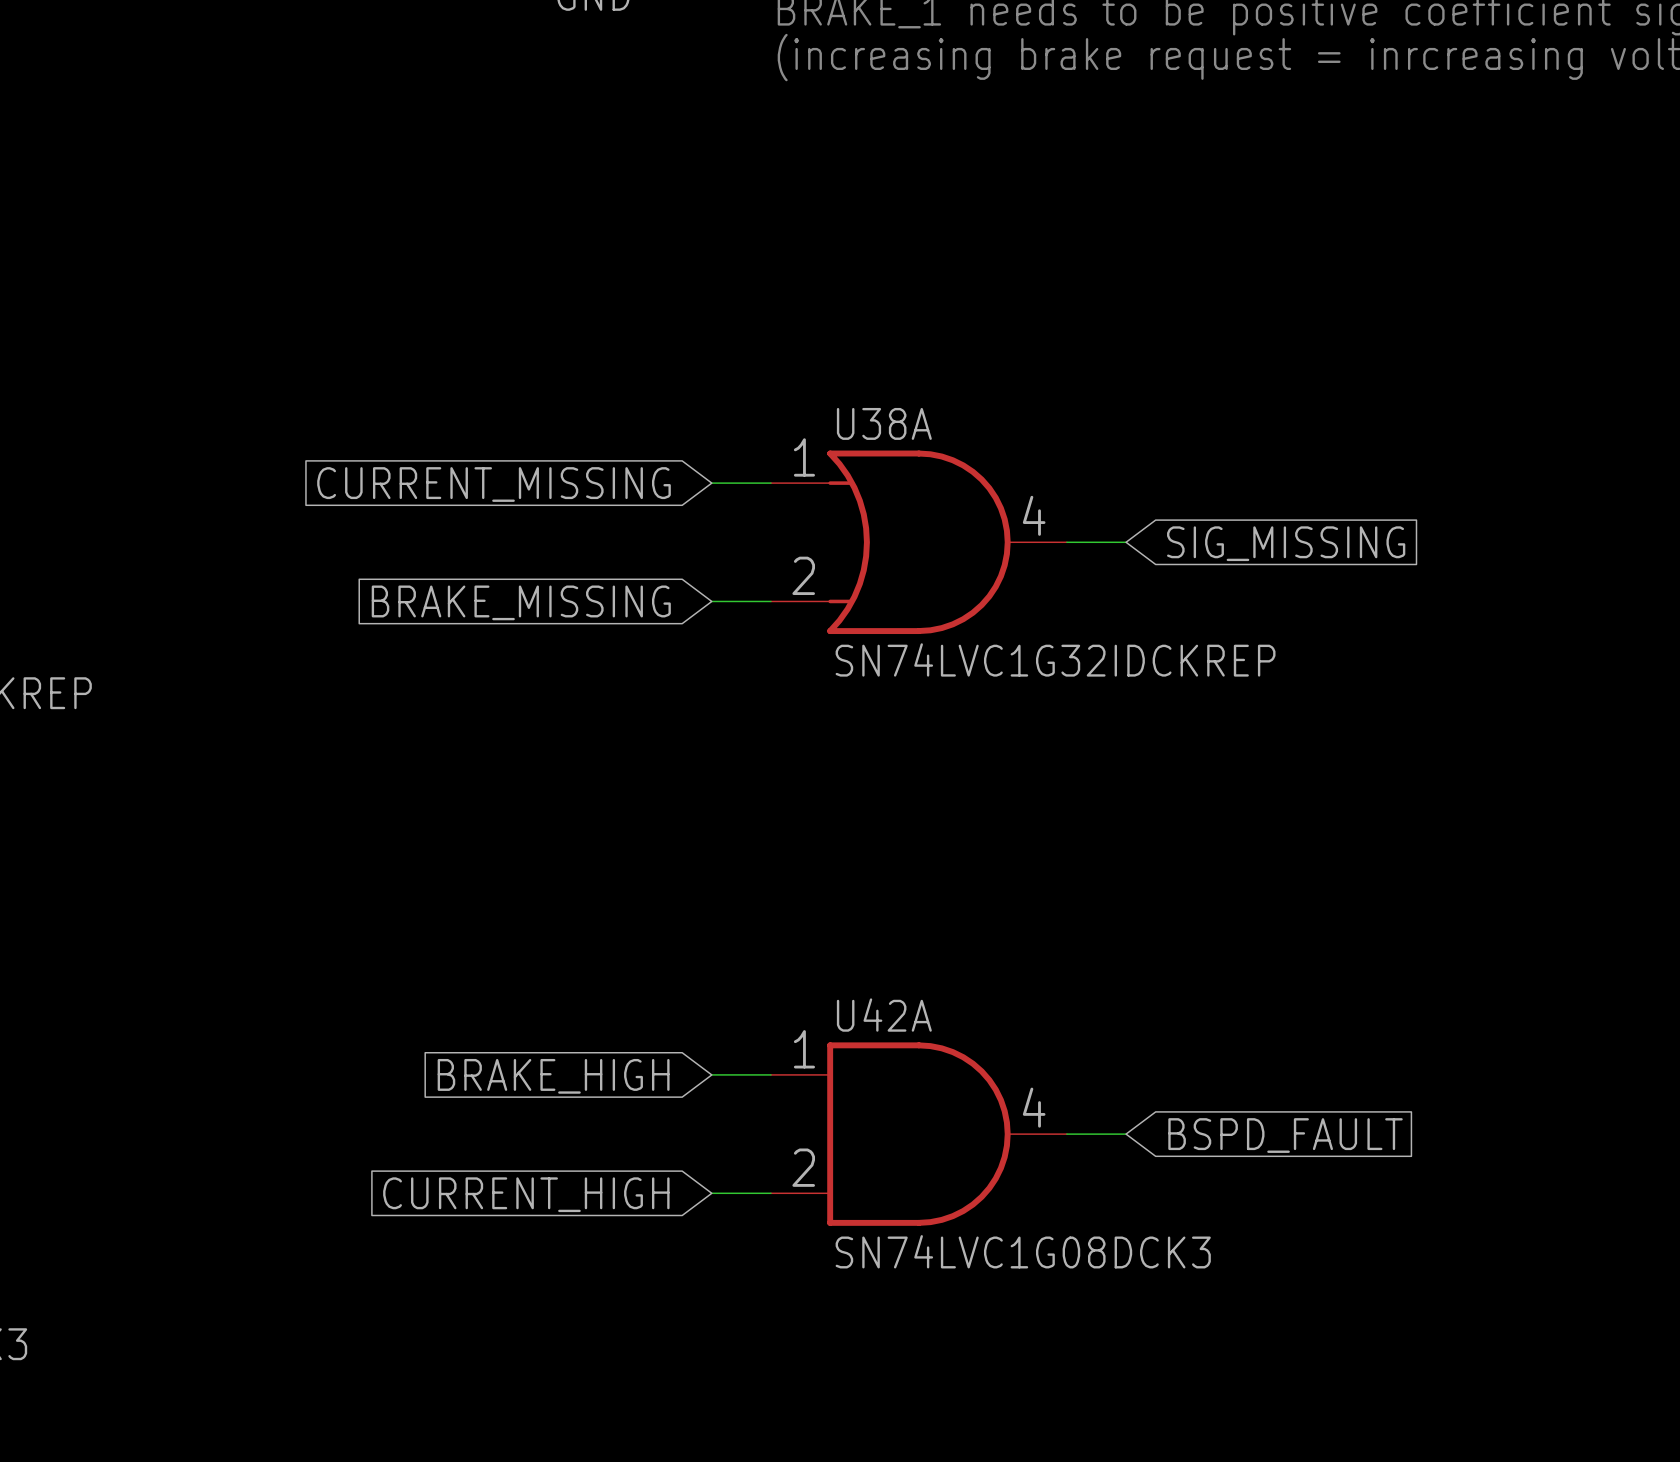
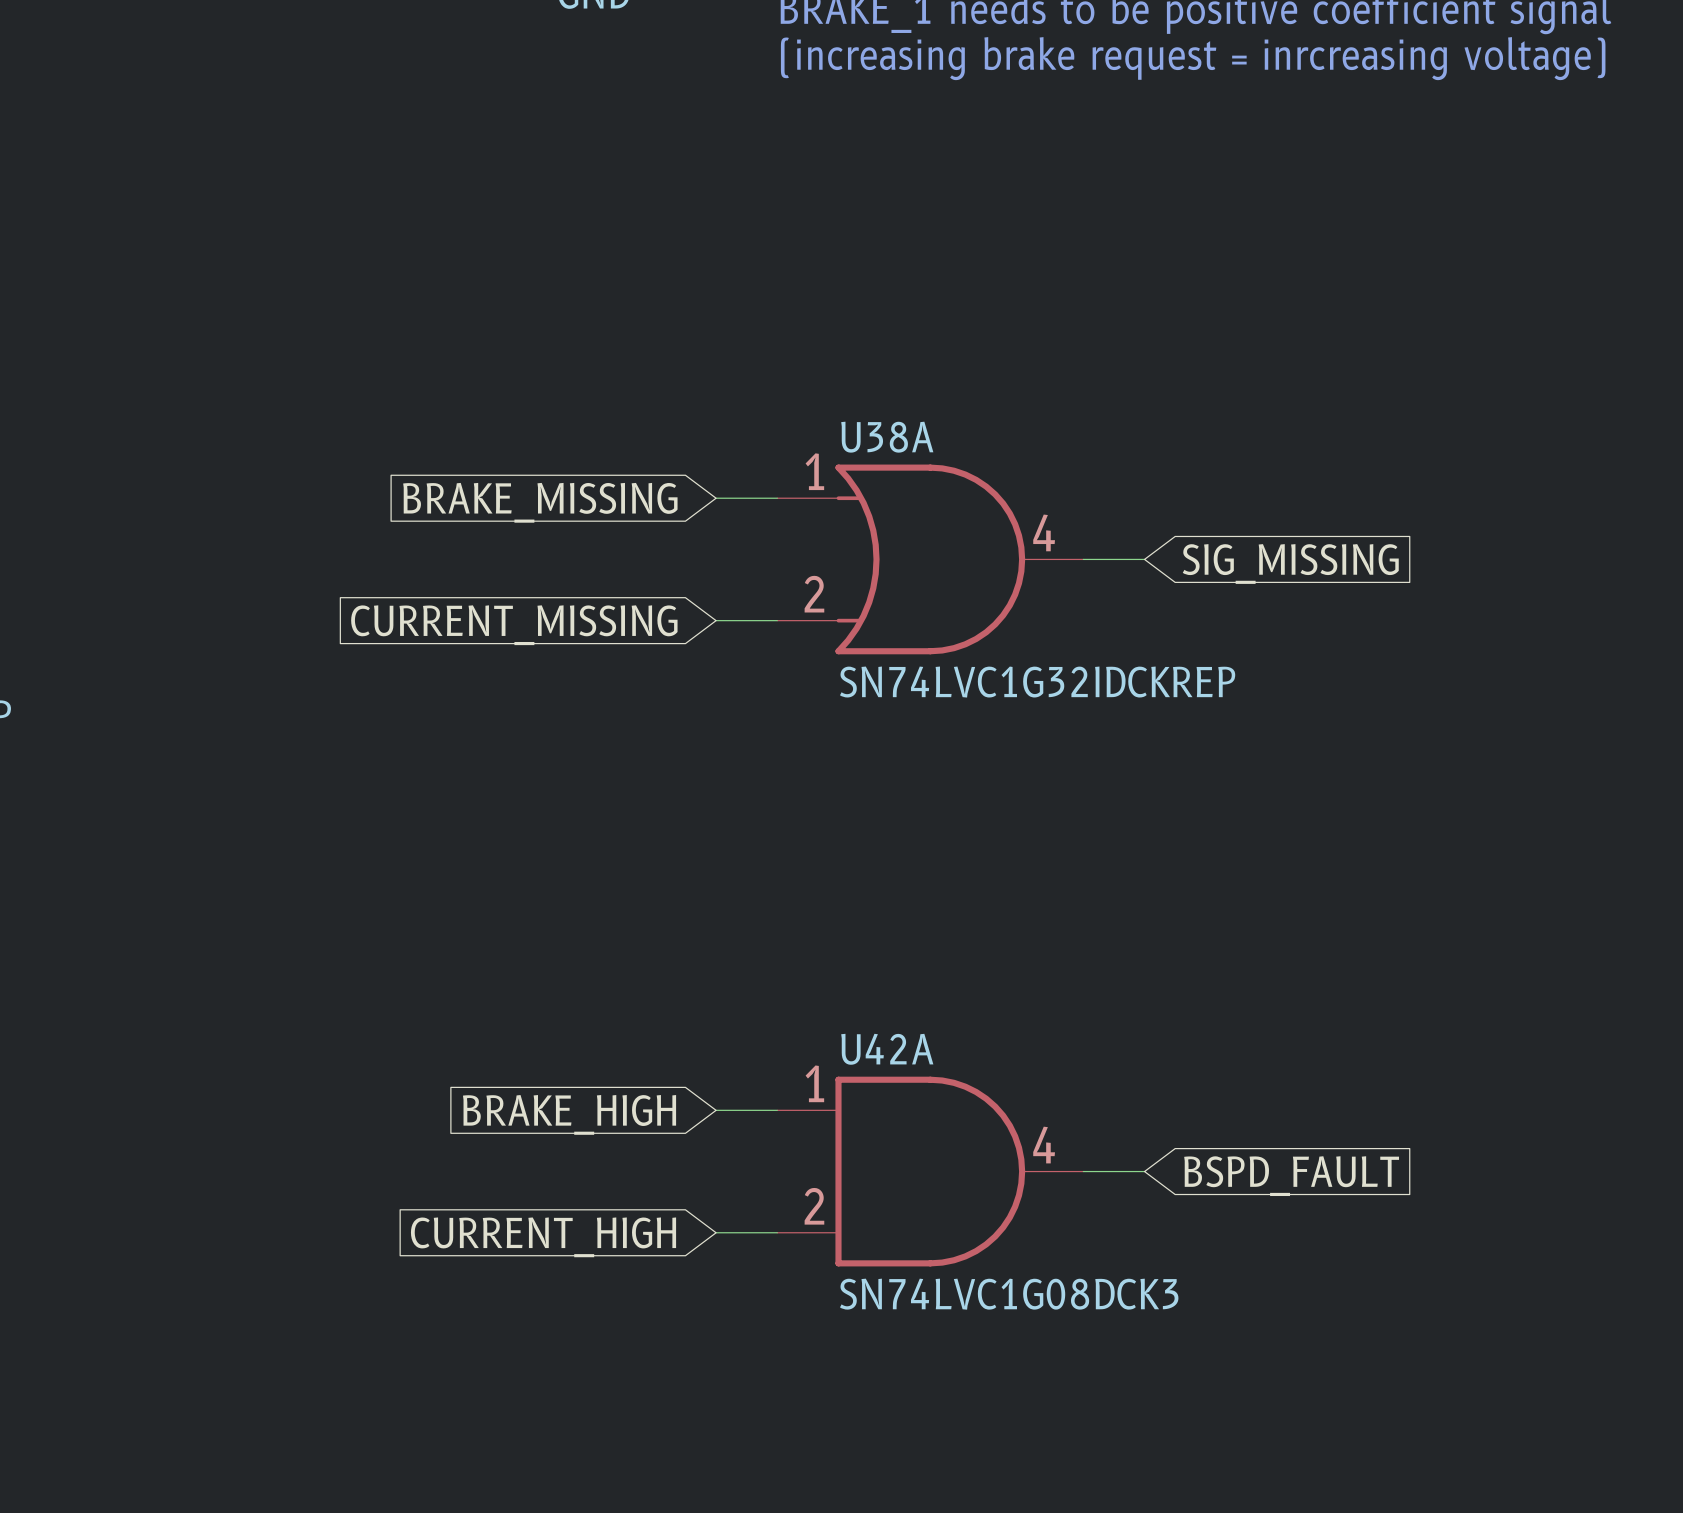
global label: CURRENT_MISSING (494, 484) -> BRAKE_MISSING (540, 502)
global label: BRAKE_MISSING (521, 602) -> CURRENT_MISSING (514, 625)

